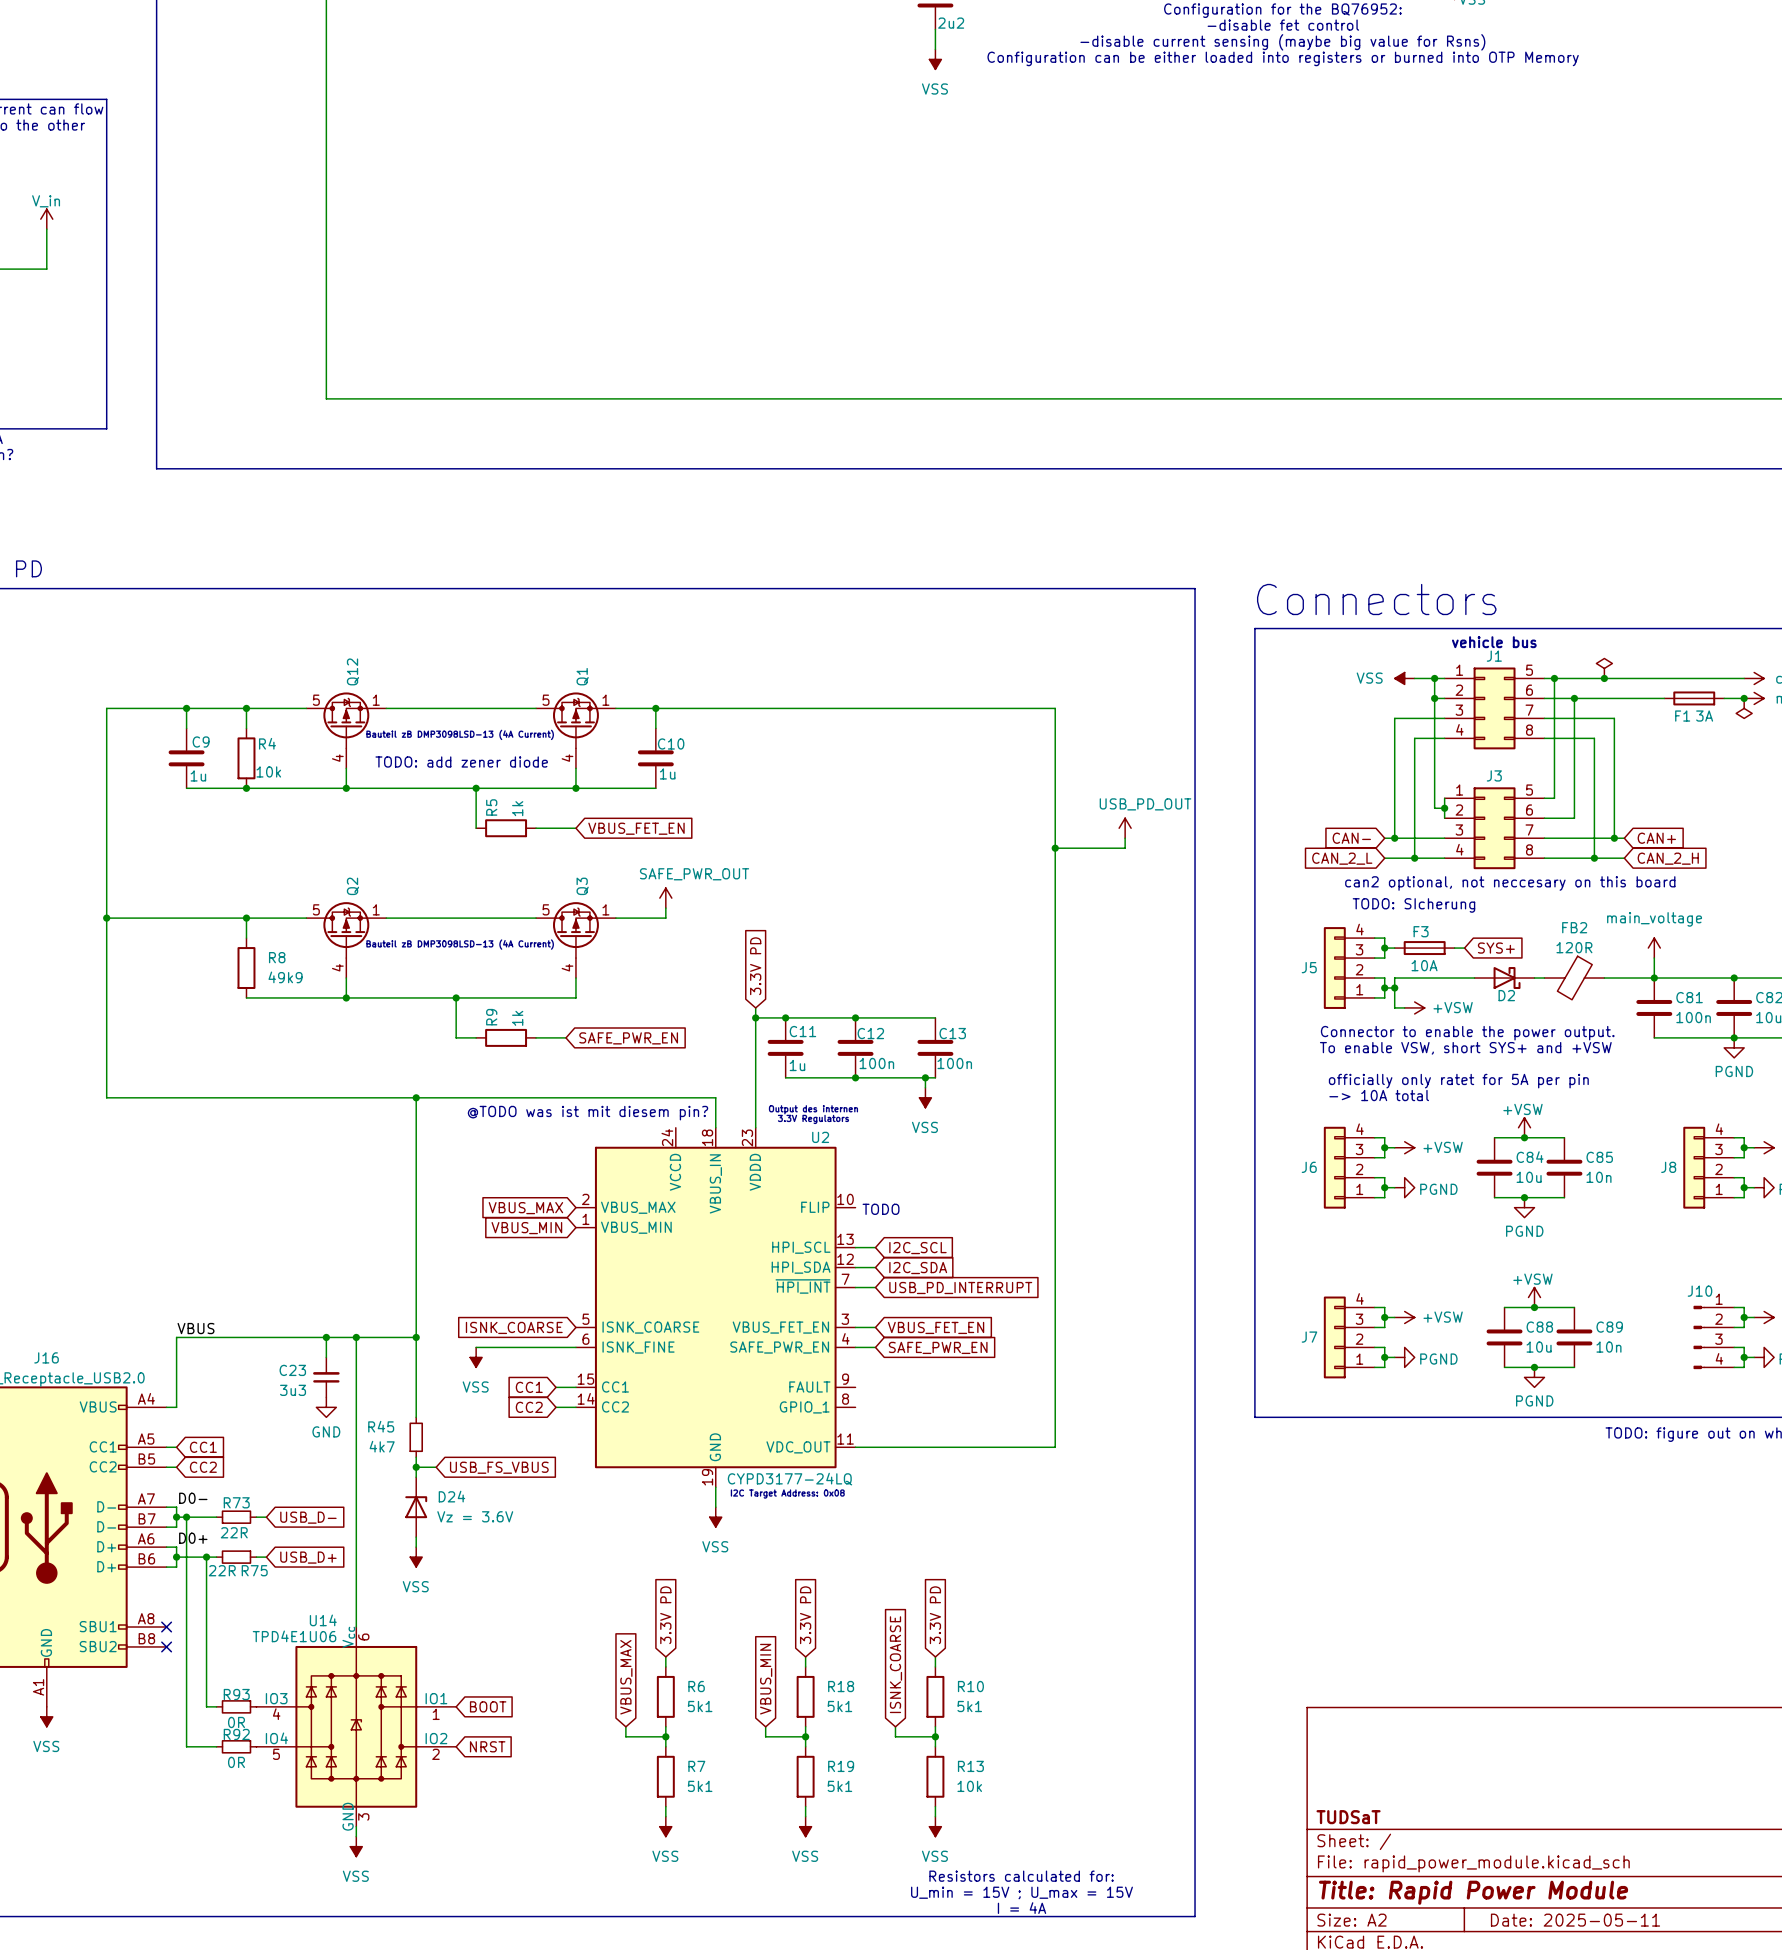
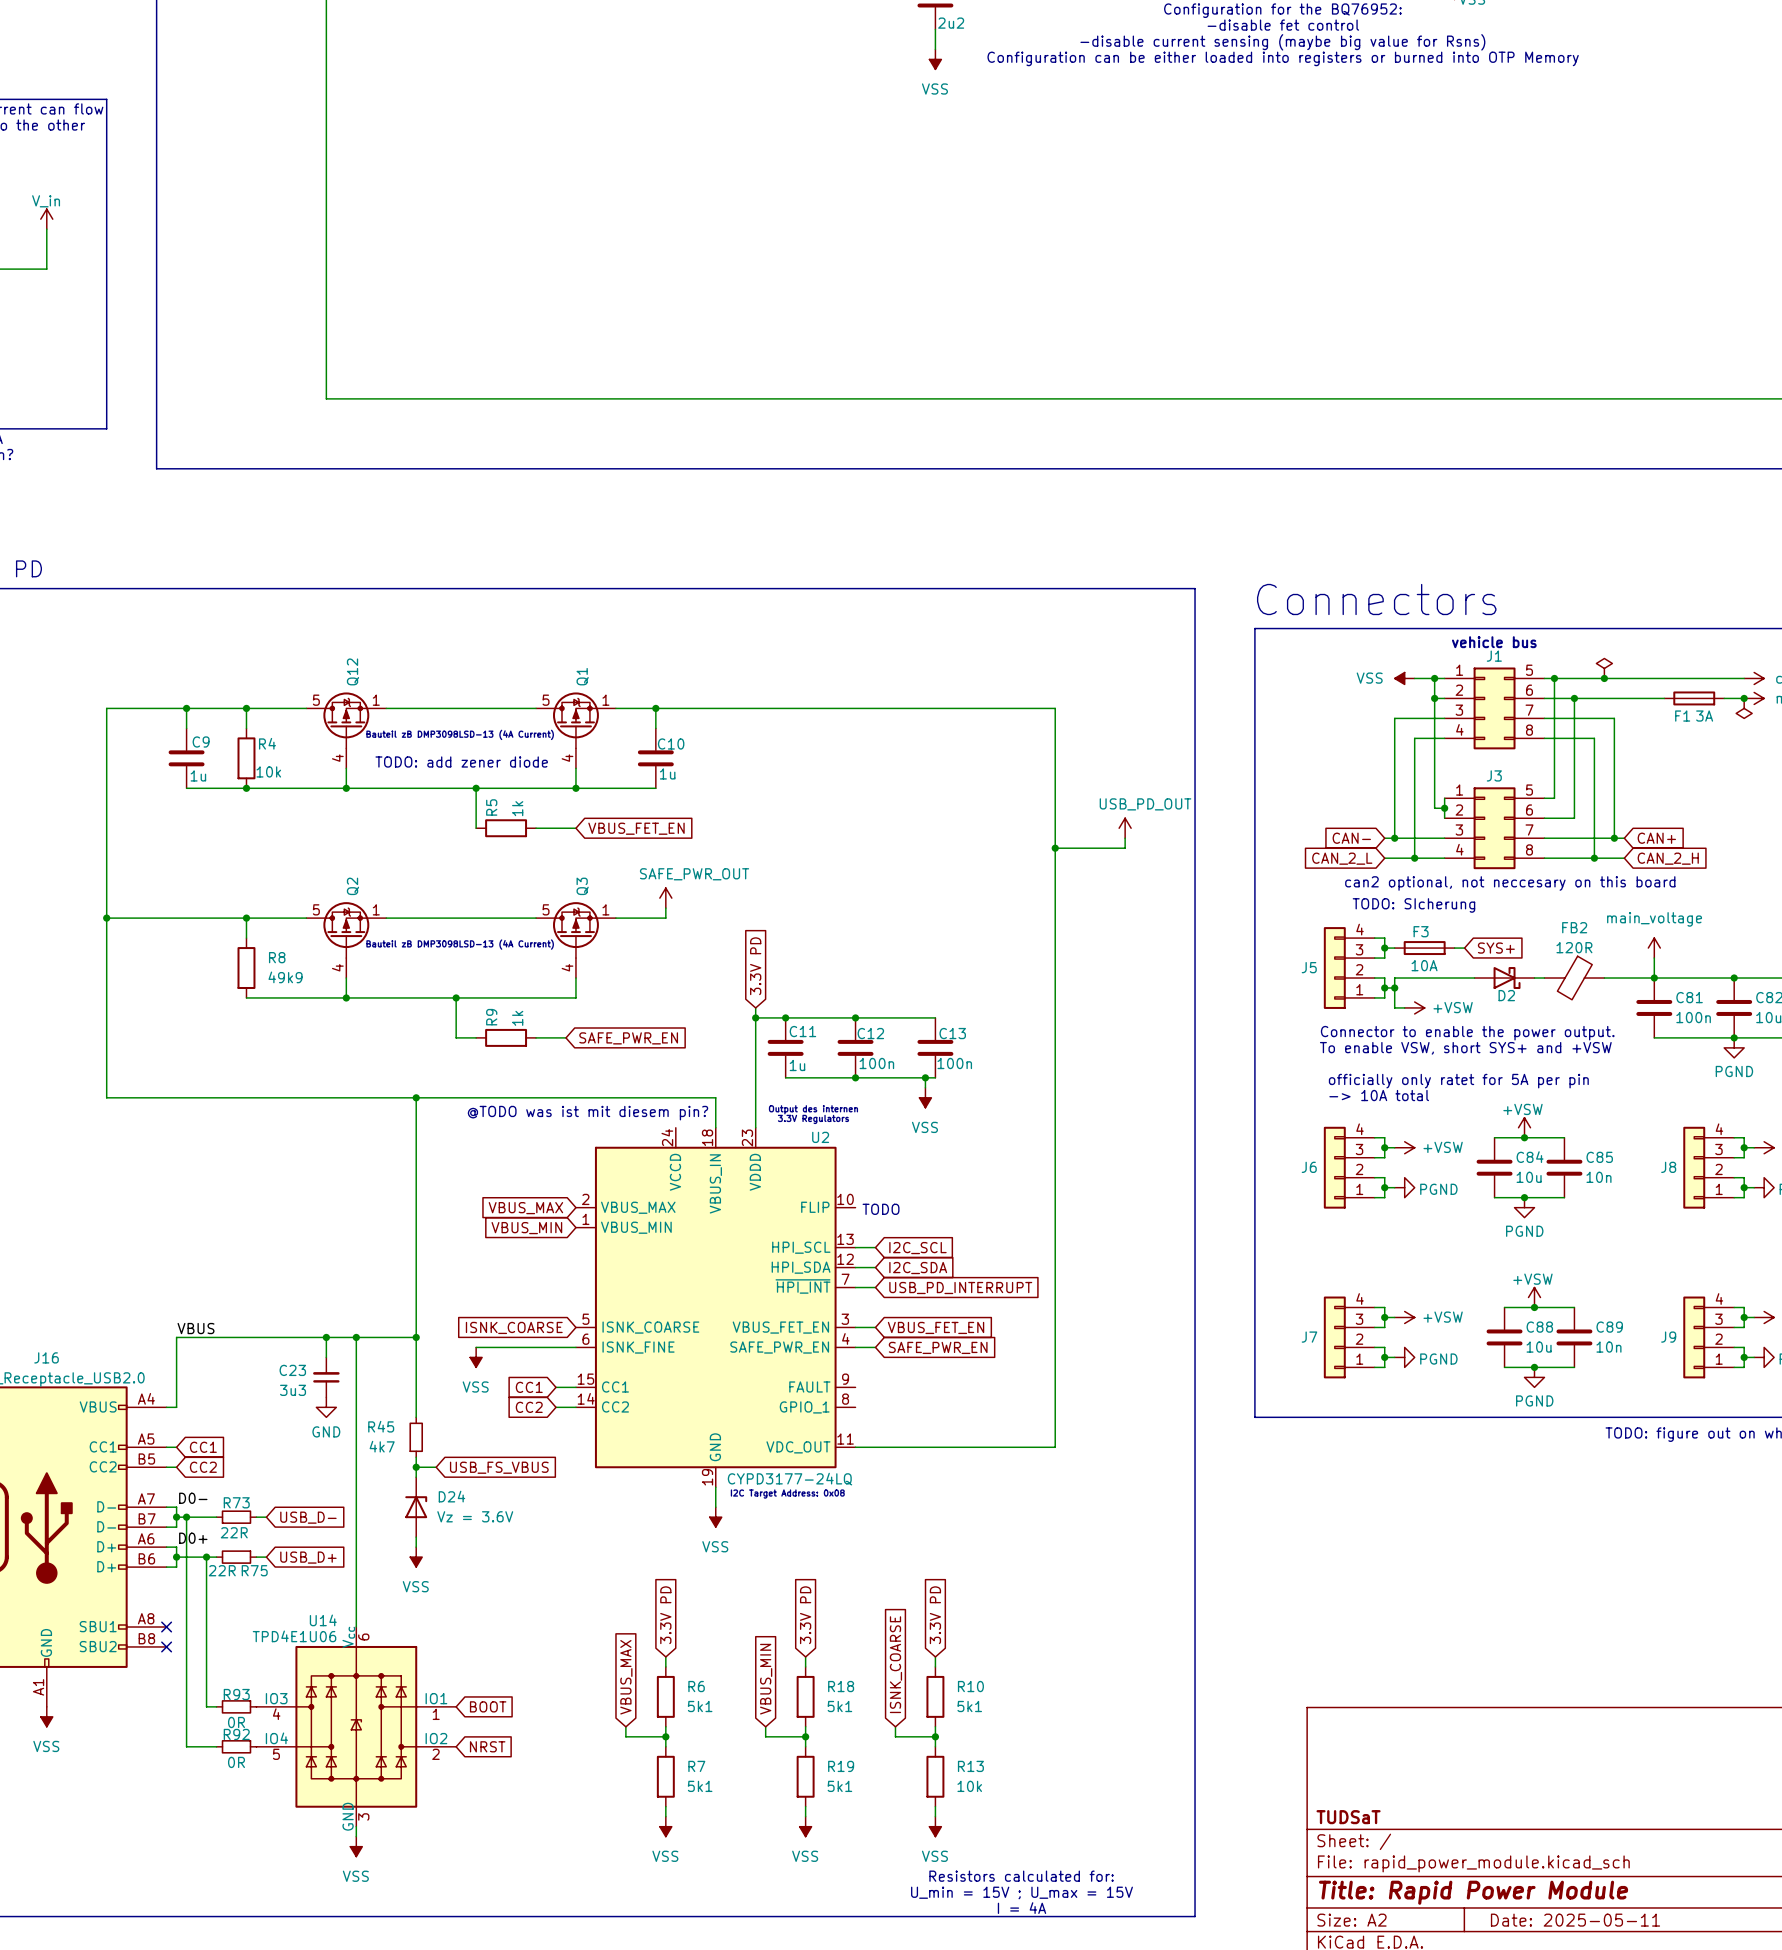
J9: none -> (1708, 1337)
J10: (1713, 1337) -> none

